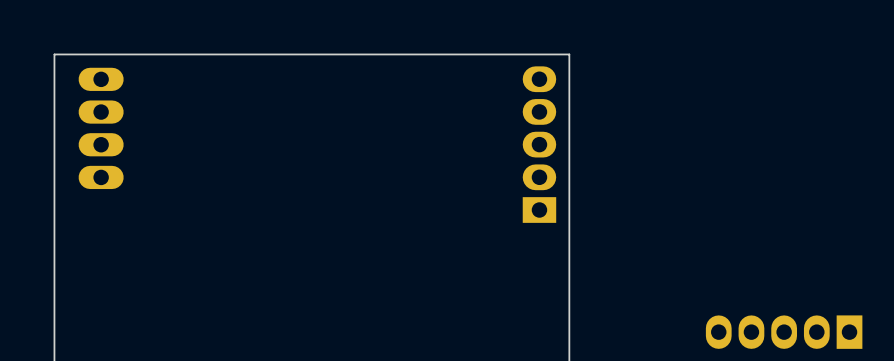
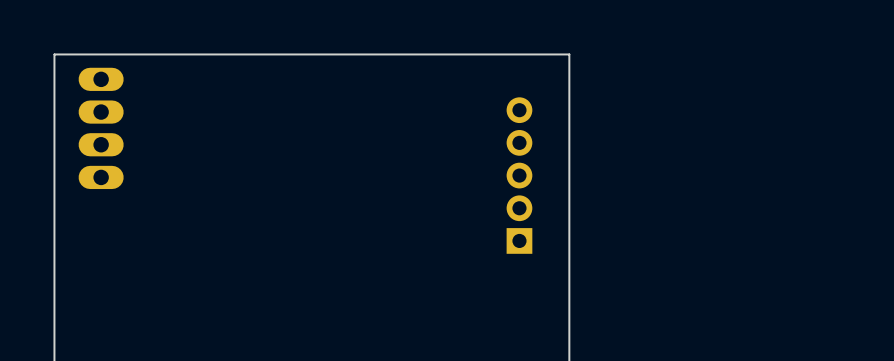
part: (539, 144) -> none
part: none -> (519, 175)
part: (784, 332) -> none

